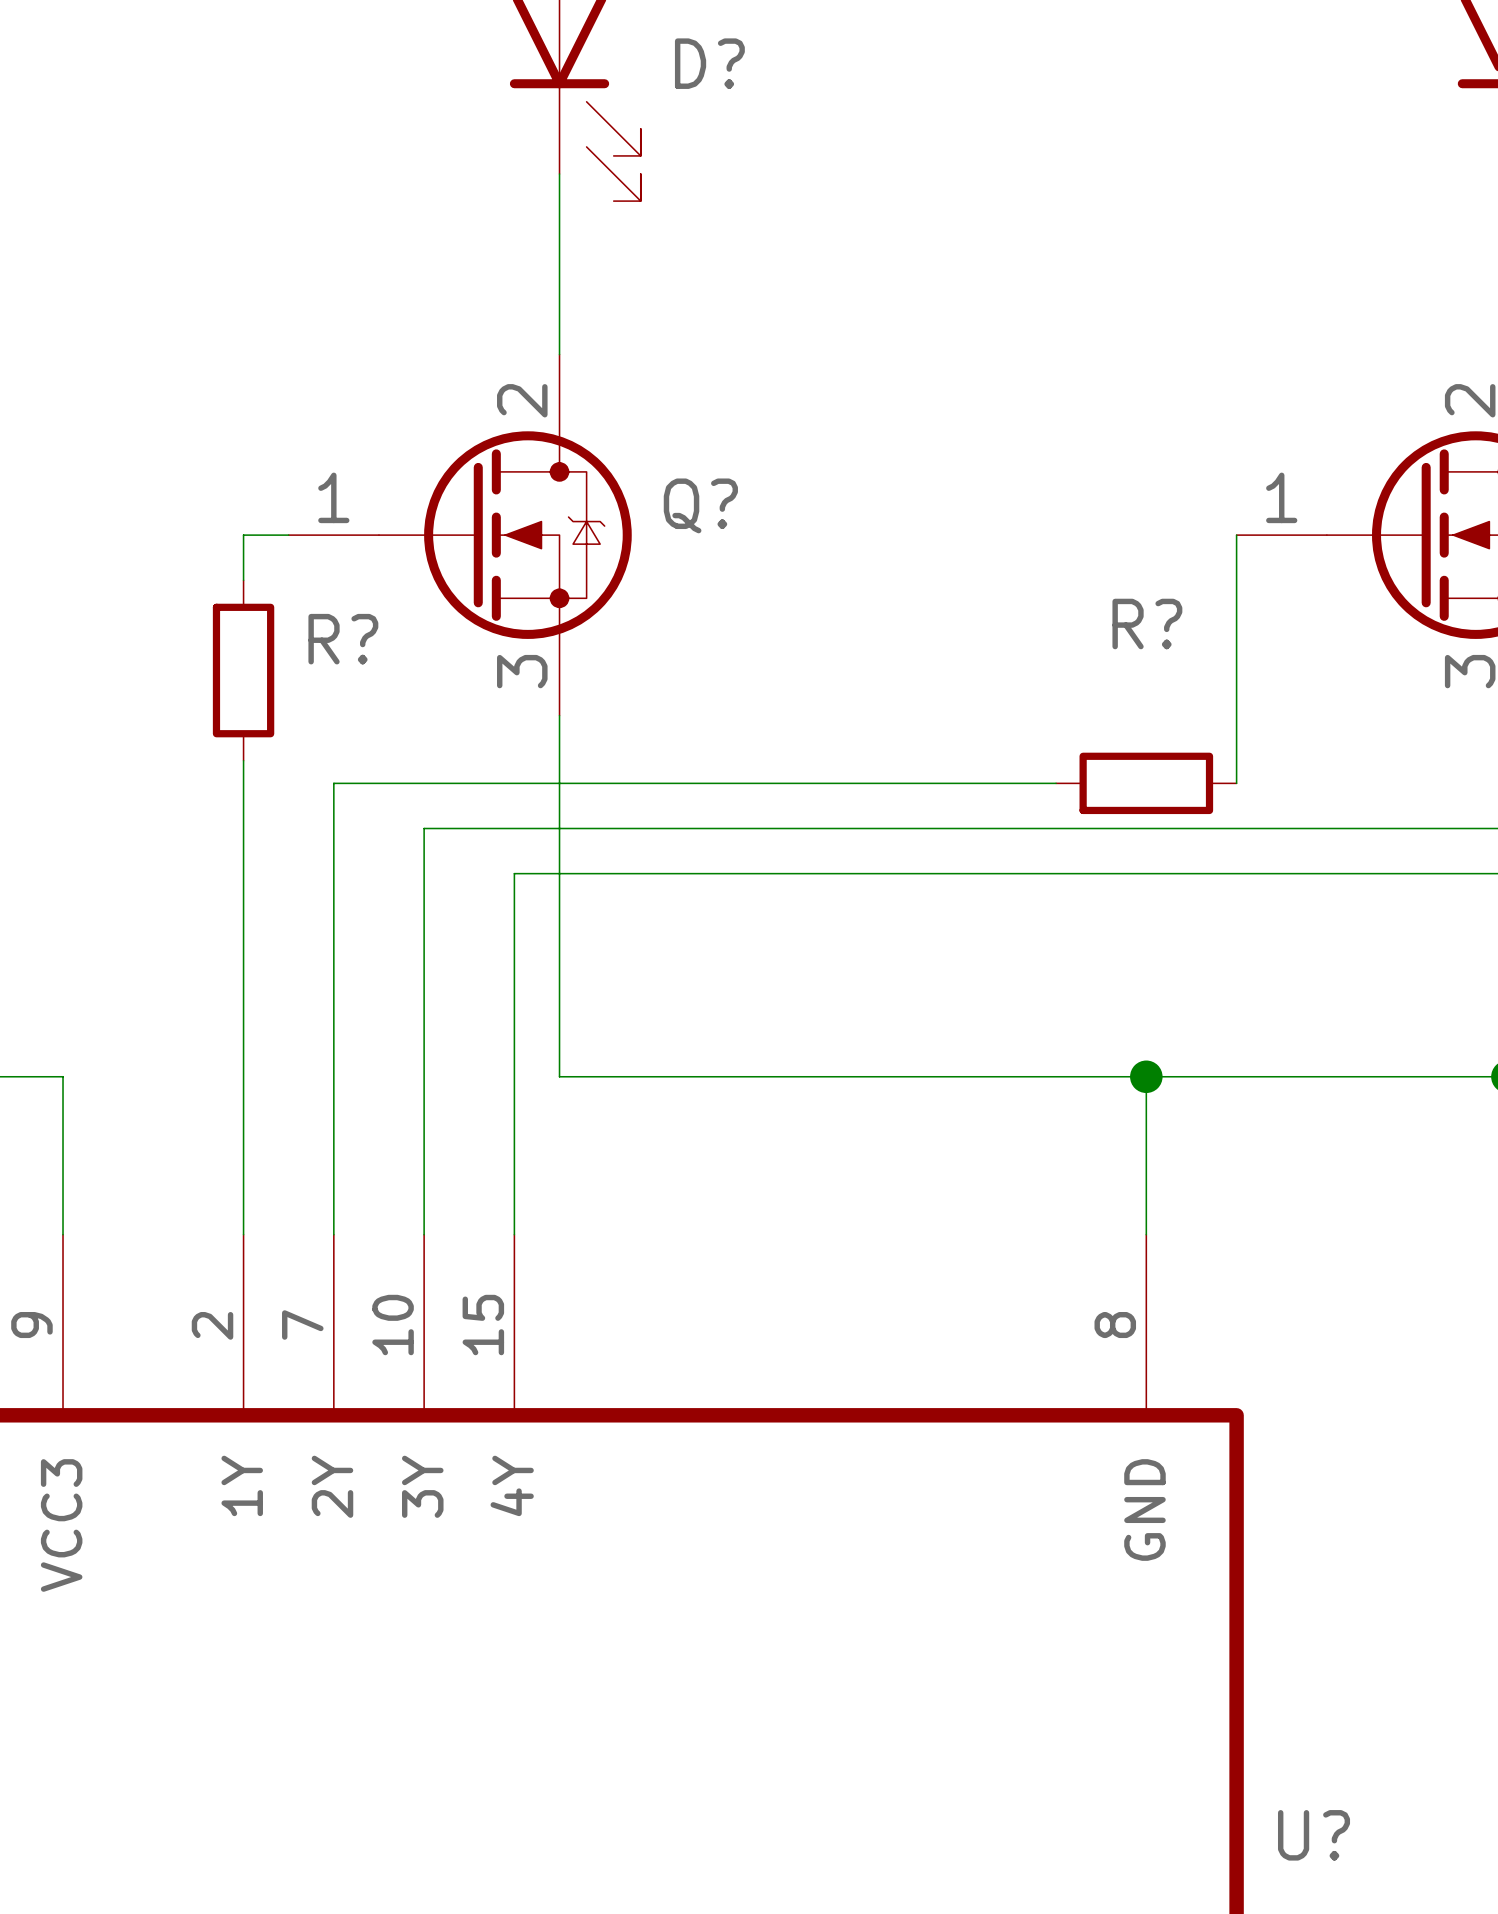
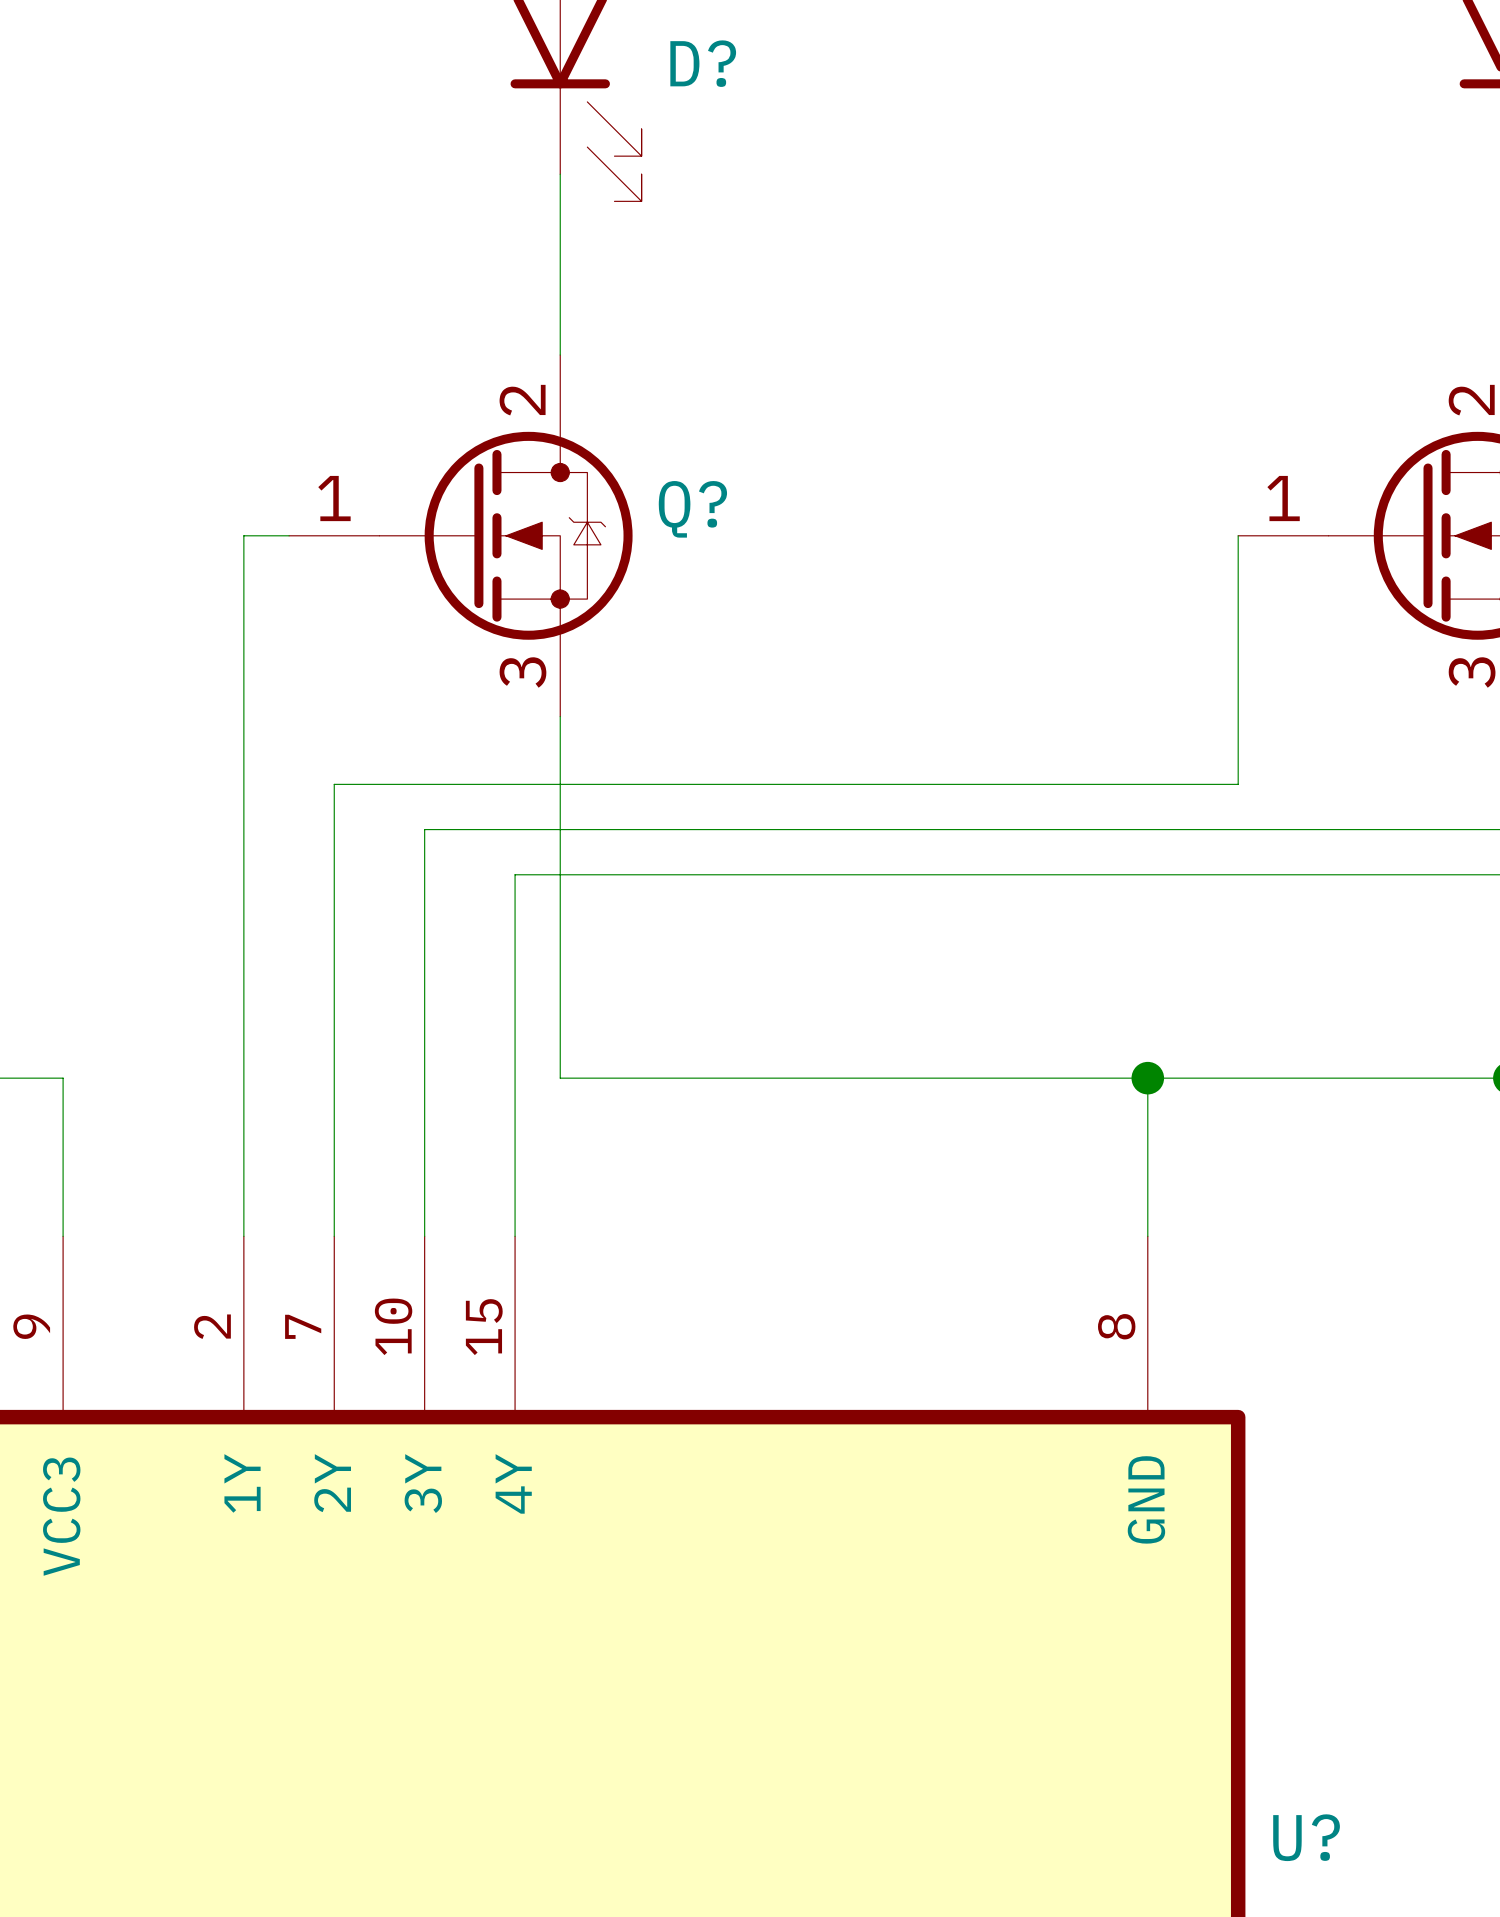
wire: none -> (243, 581) (243, 761)
R?: (243, 670) -> none
wire: none -> (1057, 784) (1238, 784)
R?: (1146, 783) -> none

